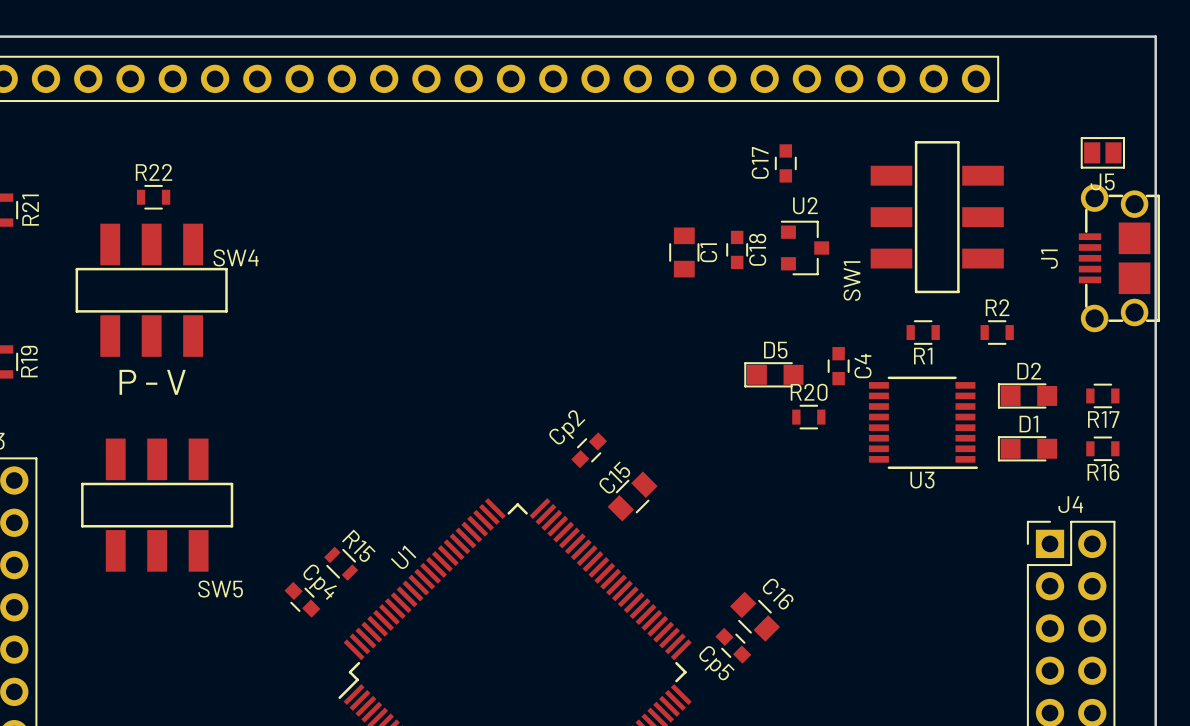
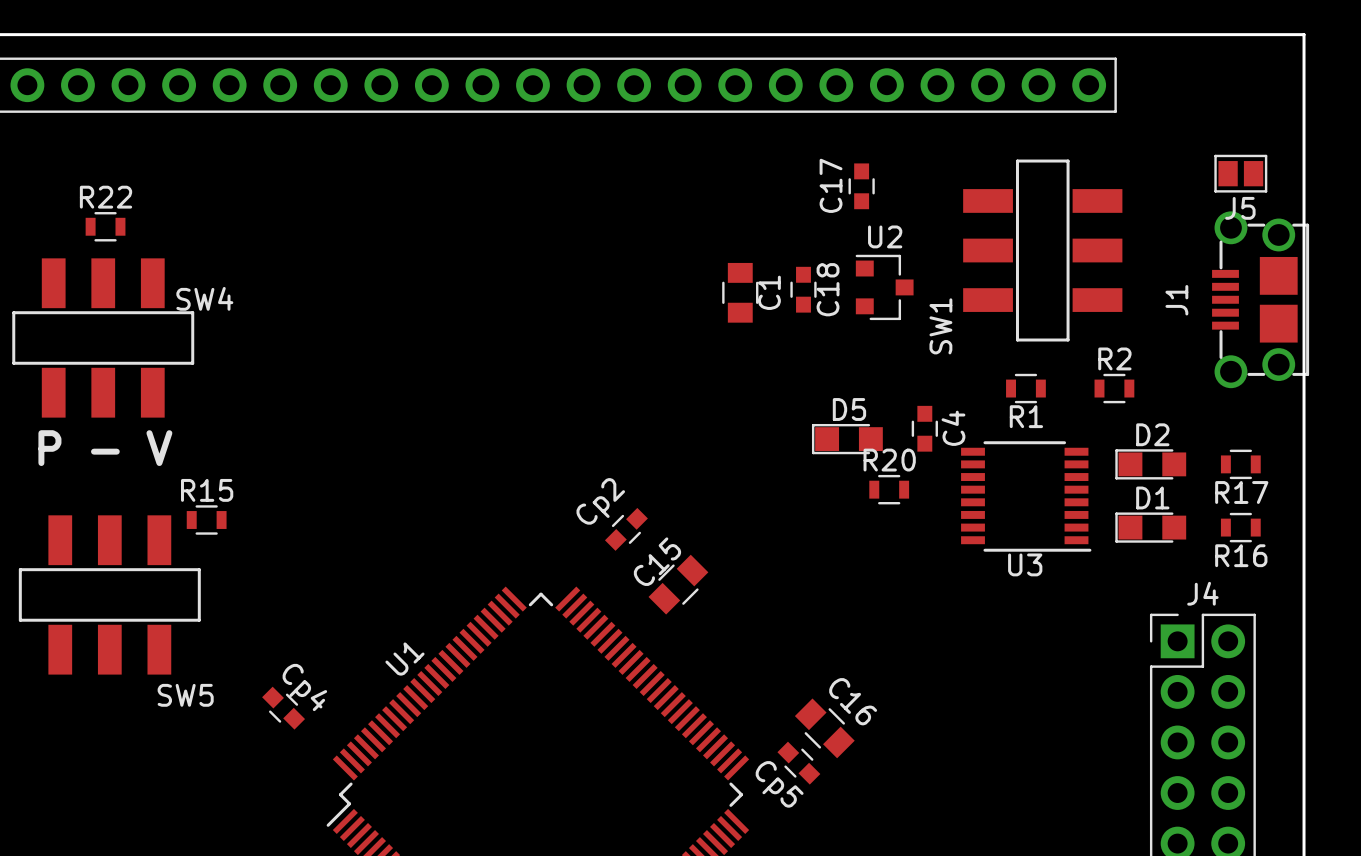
R15 rotation: 0° (341, 563) -> 45° counterclockwise (206, 520)
R15 position: (341, 563) -> (206, 520)

